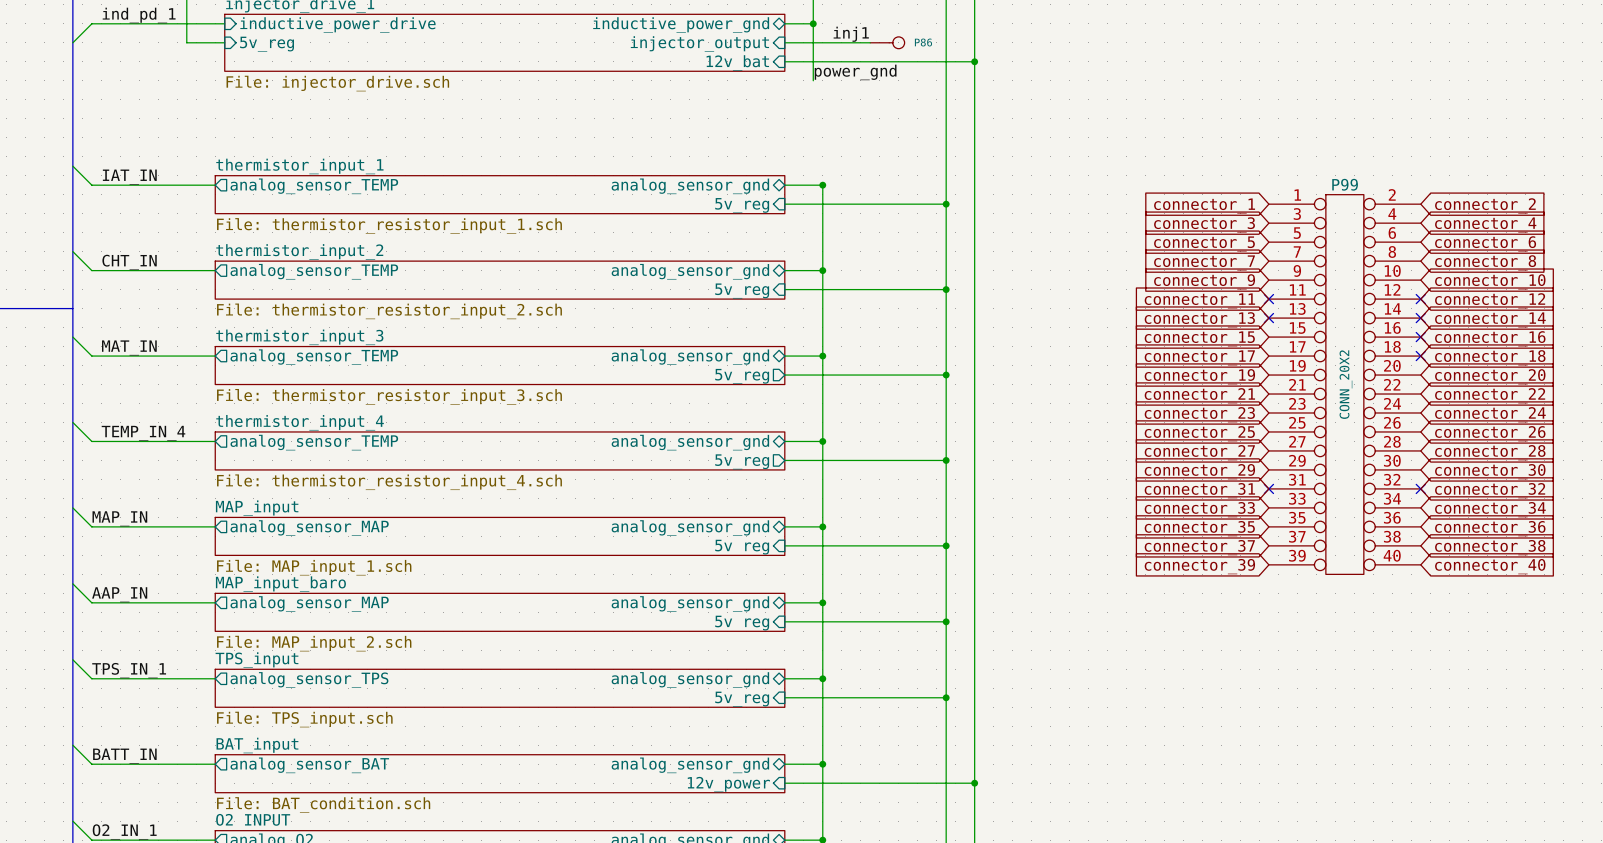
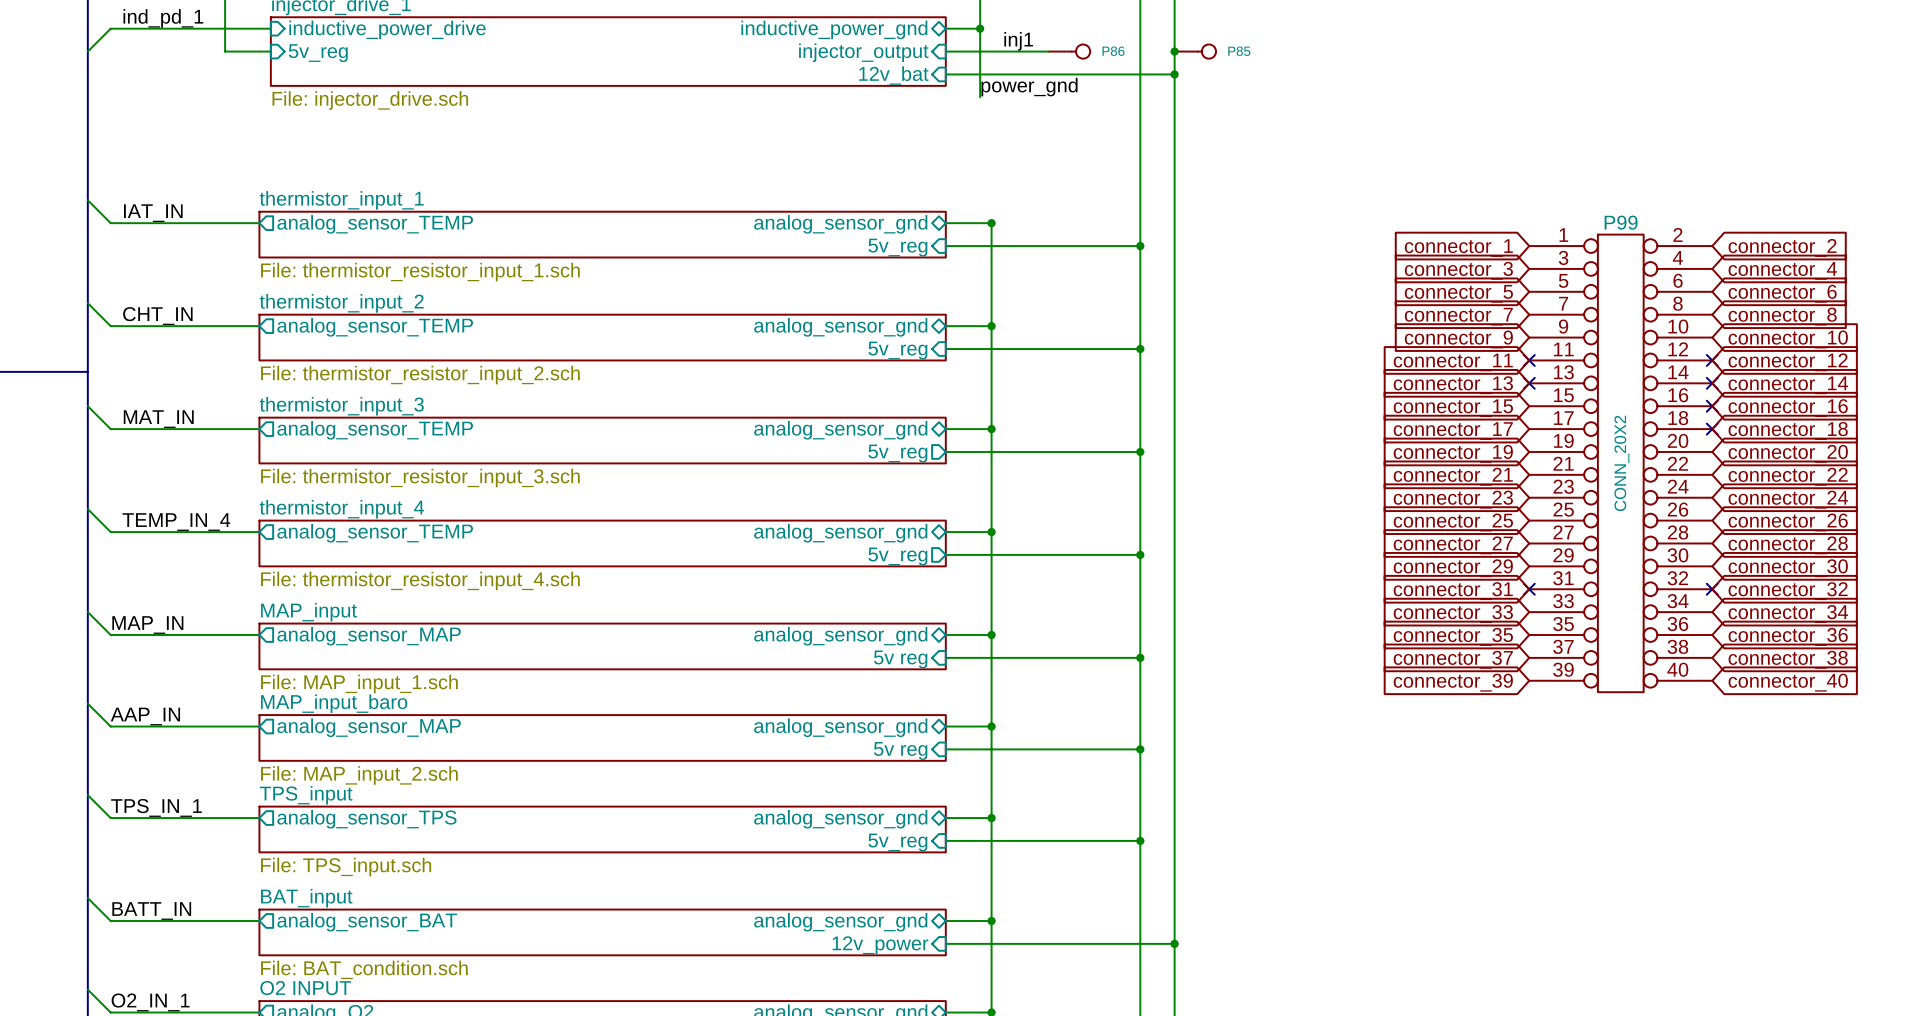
junction: none -> (1174, 51)
P85: none -> (1195, 51)

